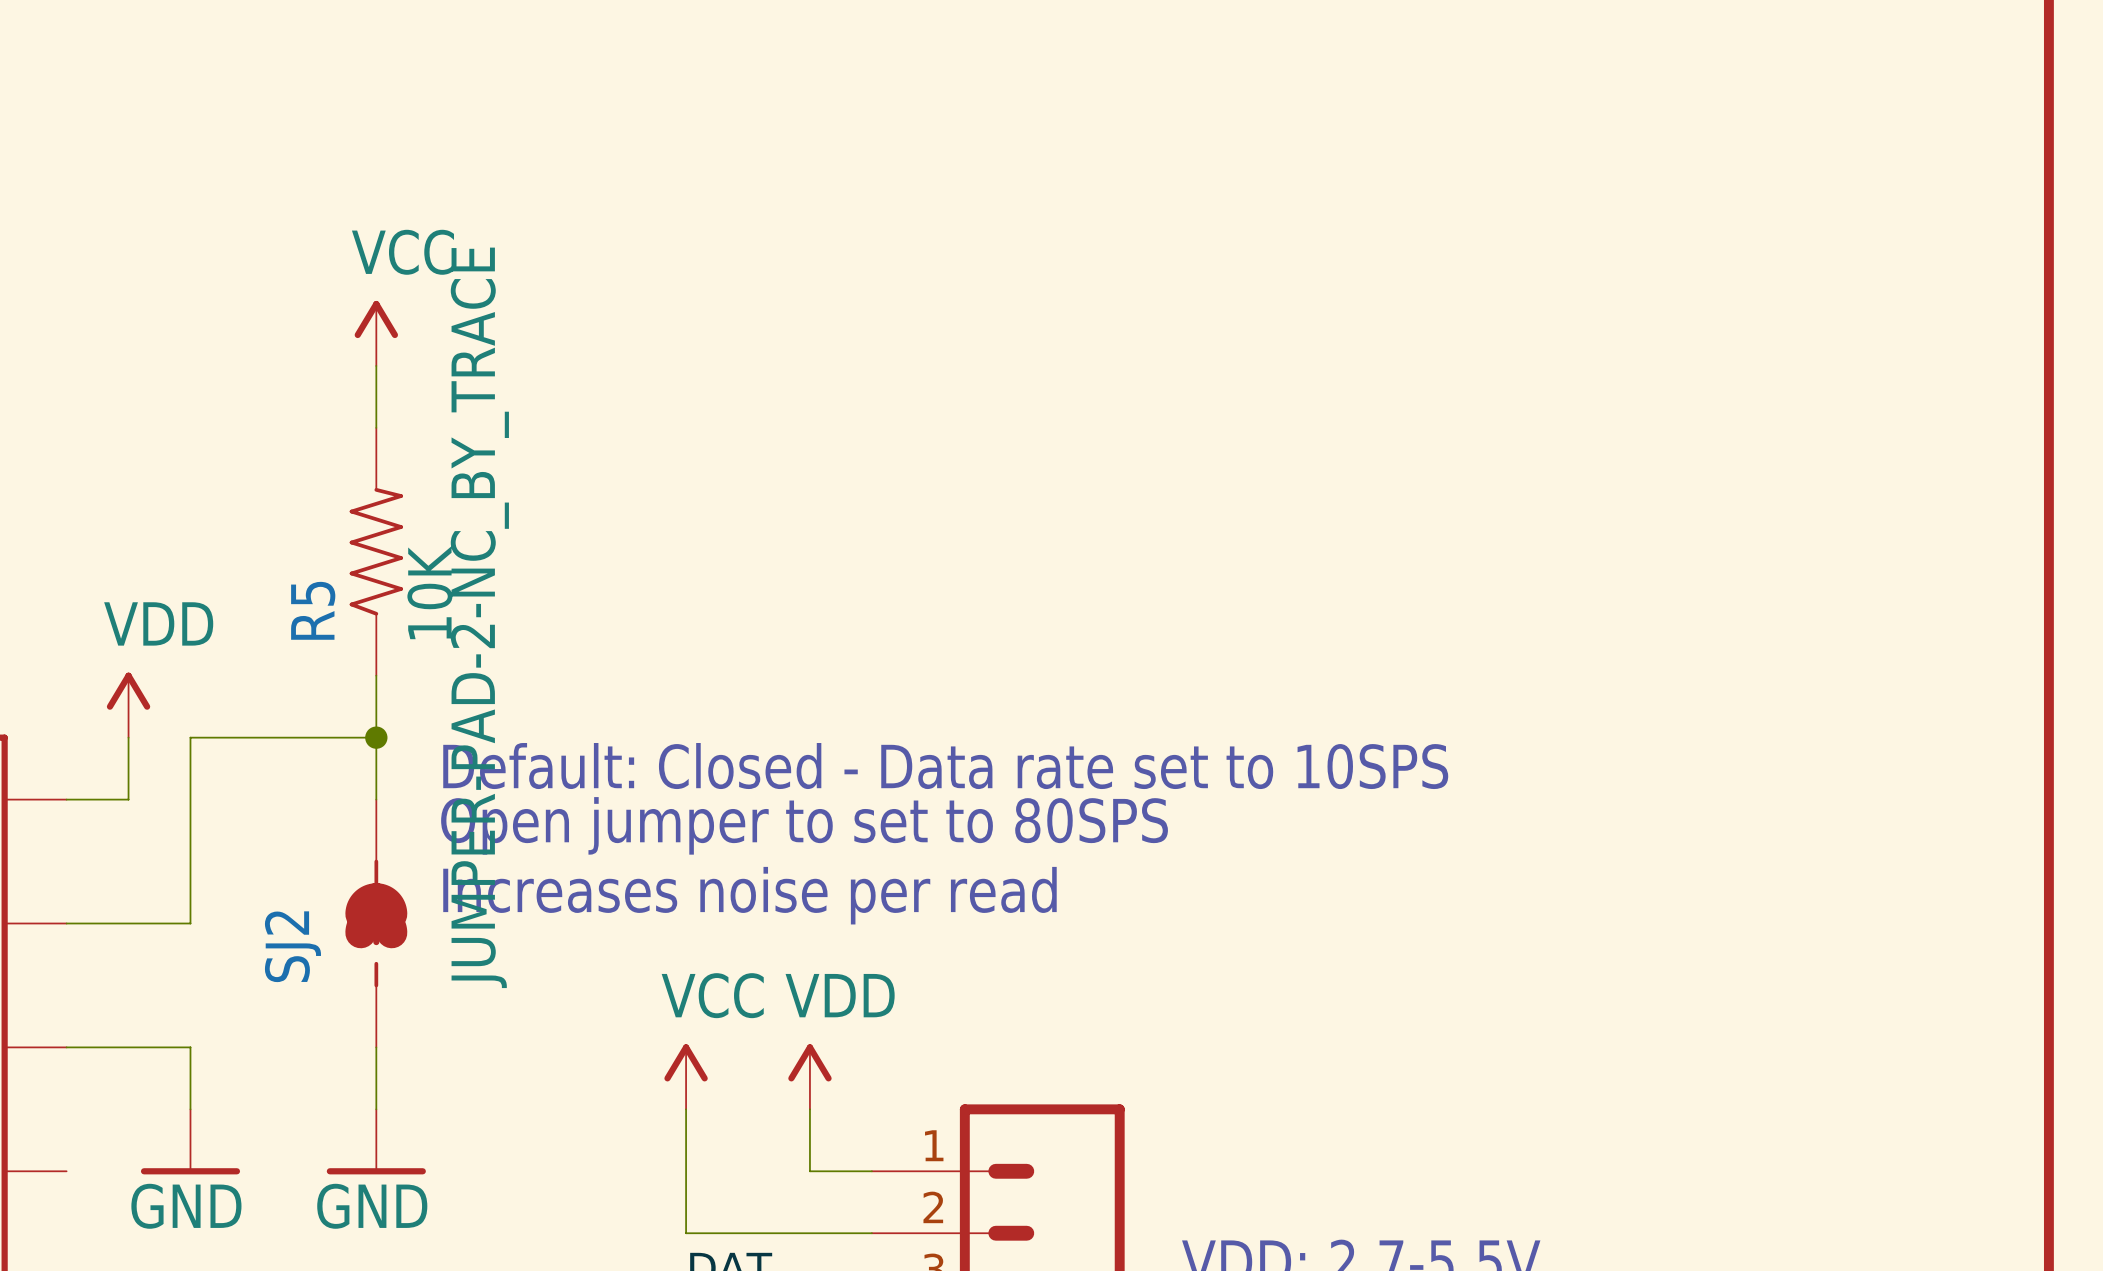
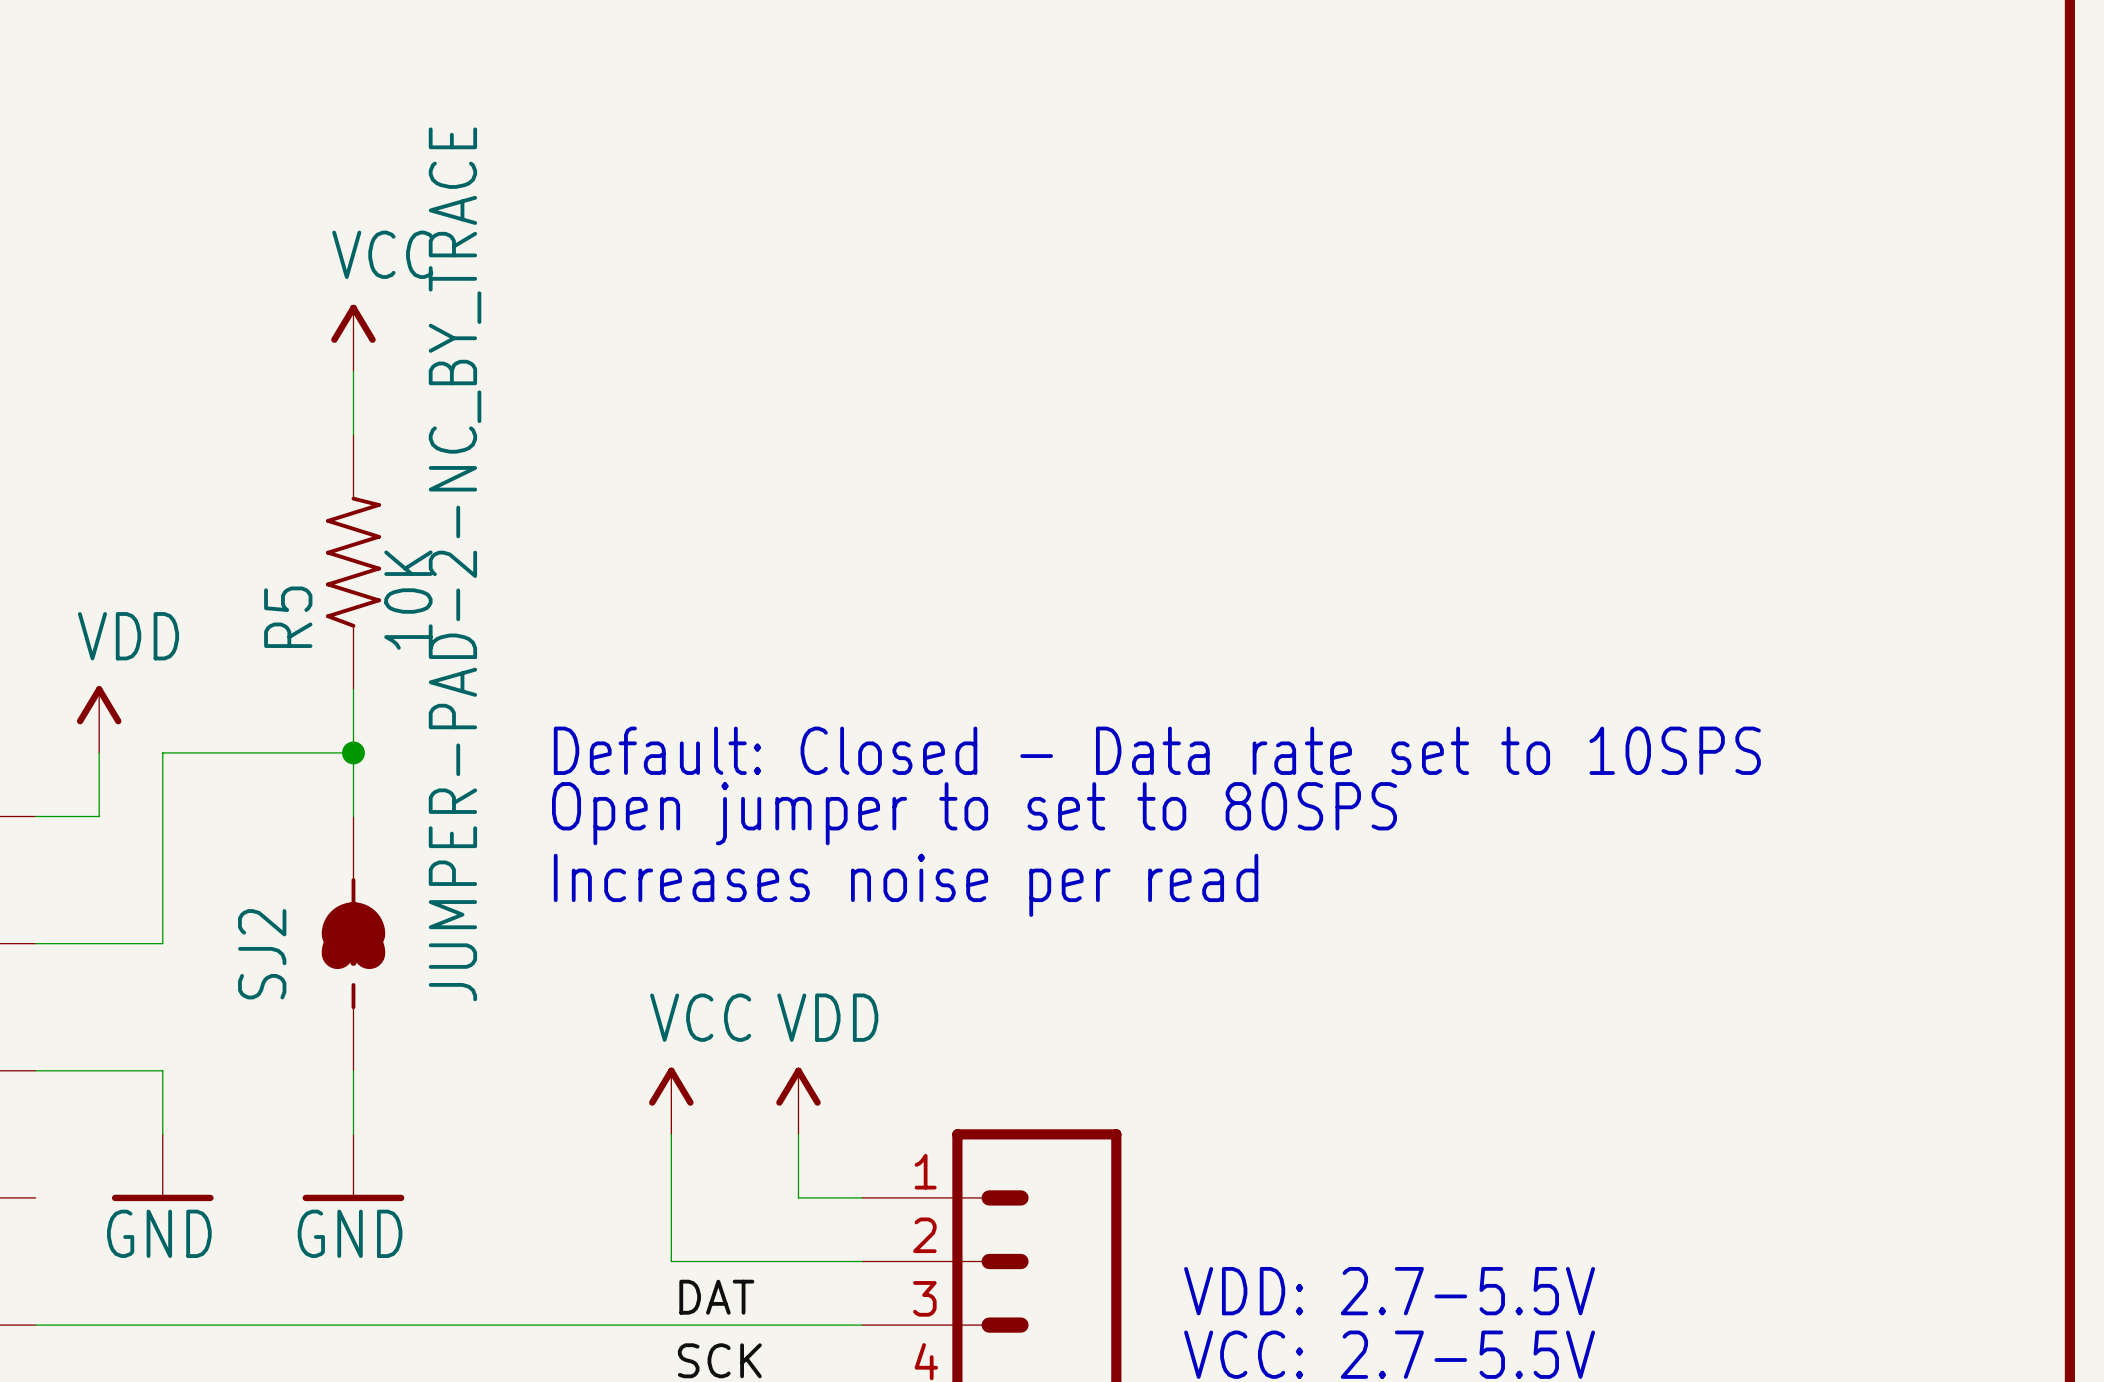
text position: Default: Closed - Data rate set to 10SPS (945, 766) -> Default: Closed - Data rate set to 10SPS (1157, 750)
text position: Open jumper to set to 80SPS (804, 825) -> Open jumper to set to 80SPS (974, 813)
text position: Increases noise per read (749, 895) -> Increases noise per read (906, 885)

